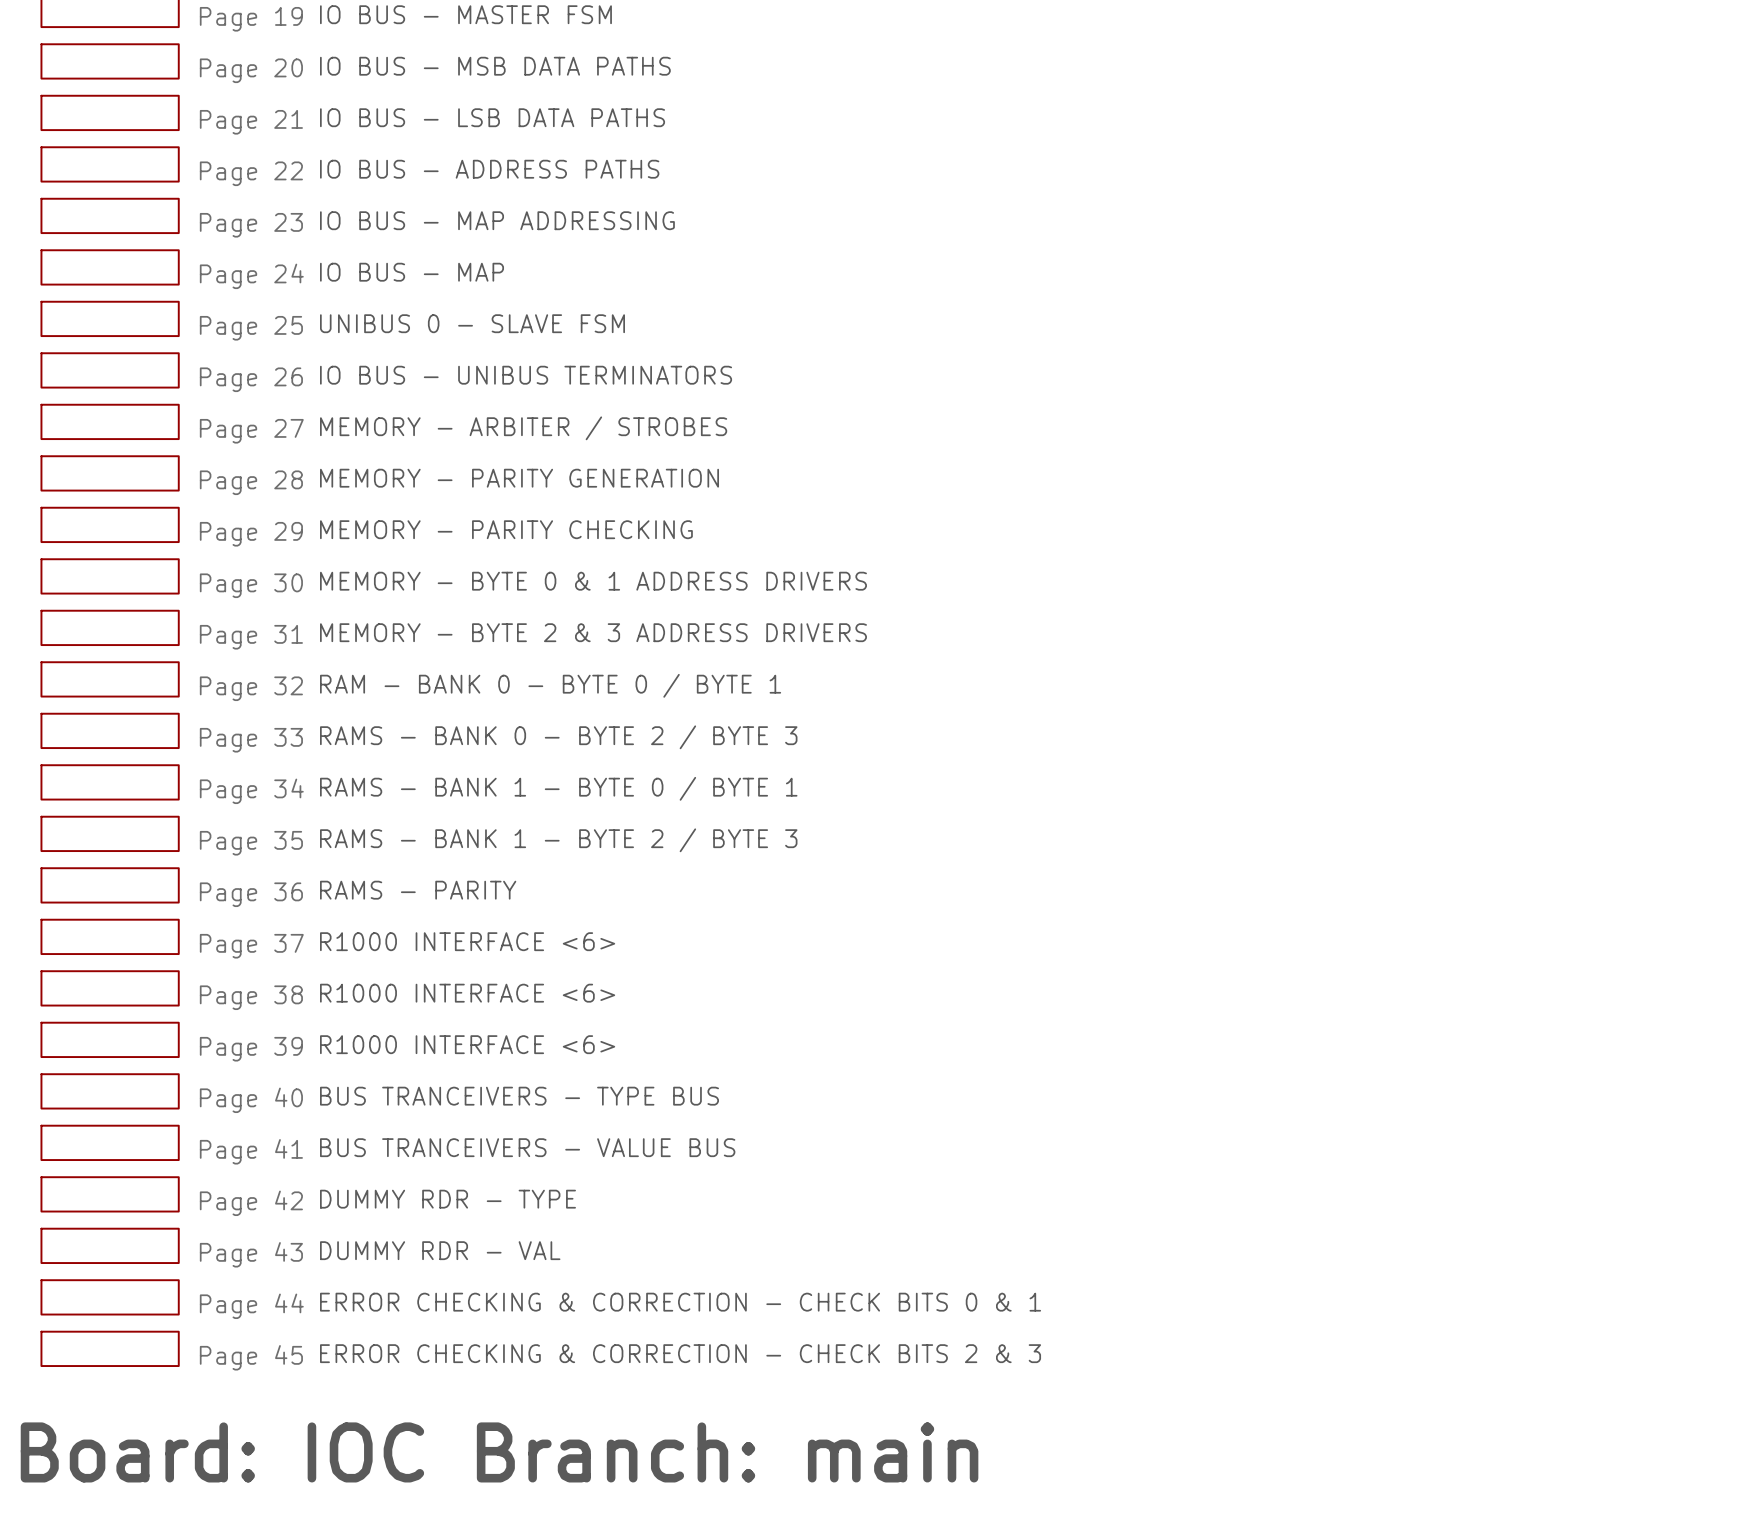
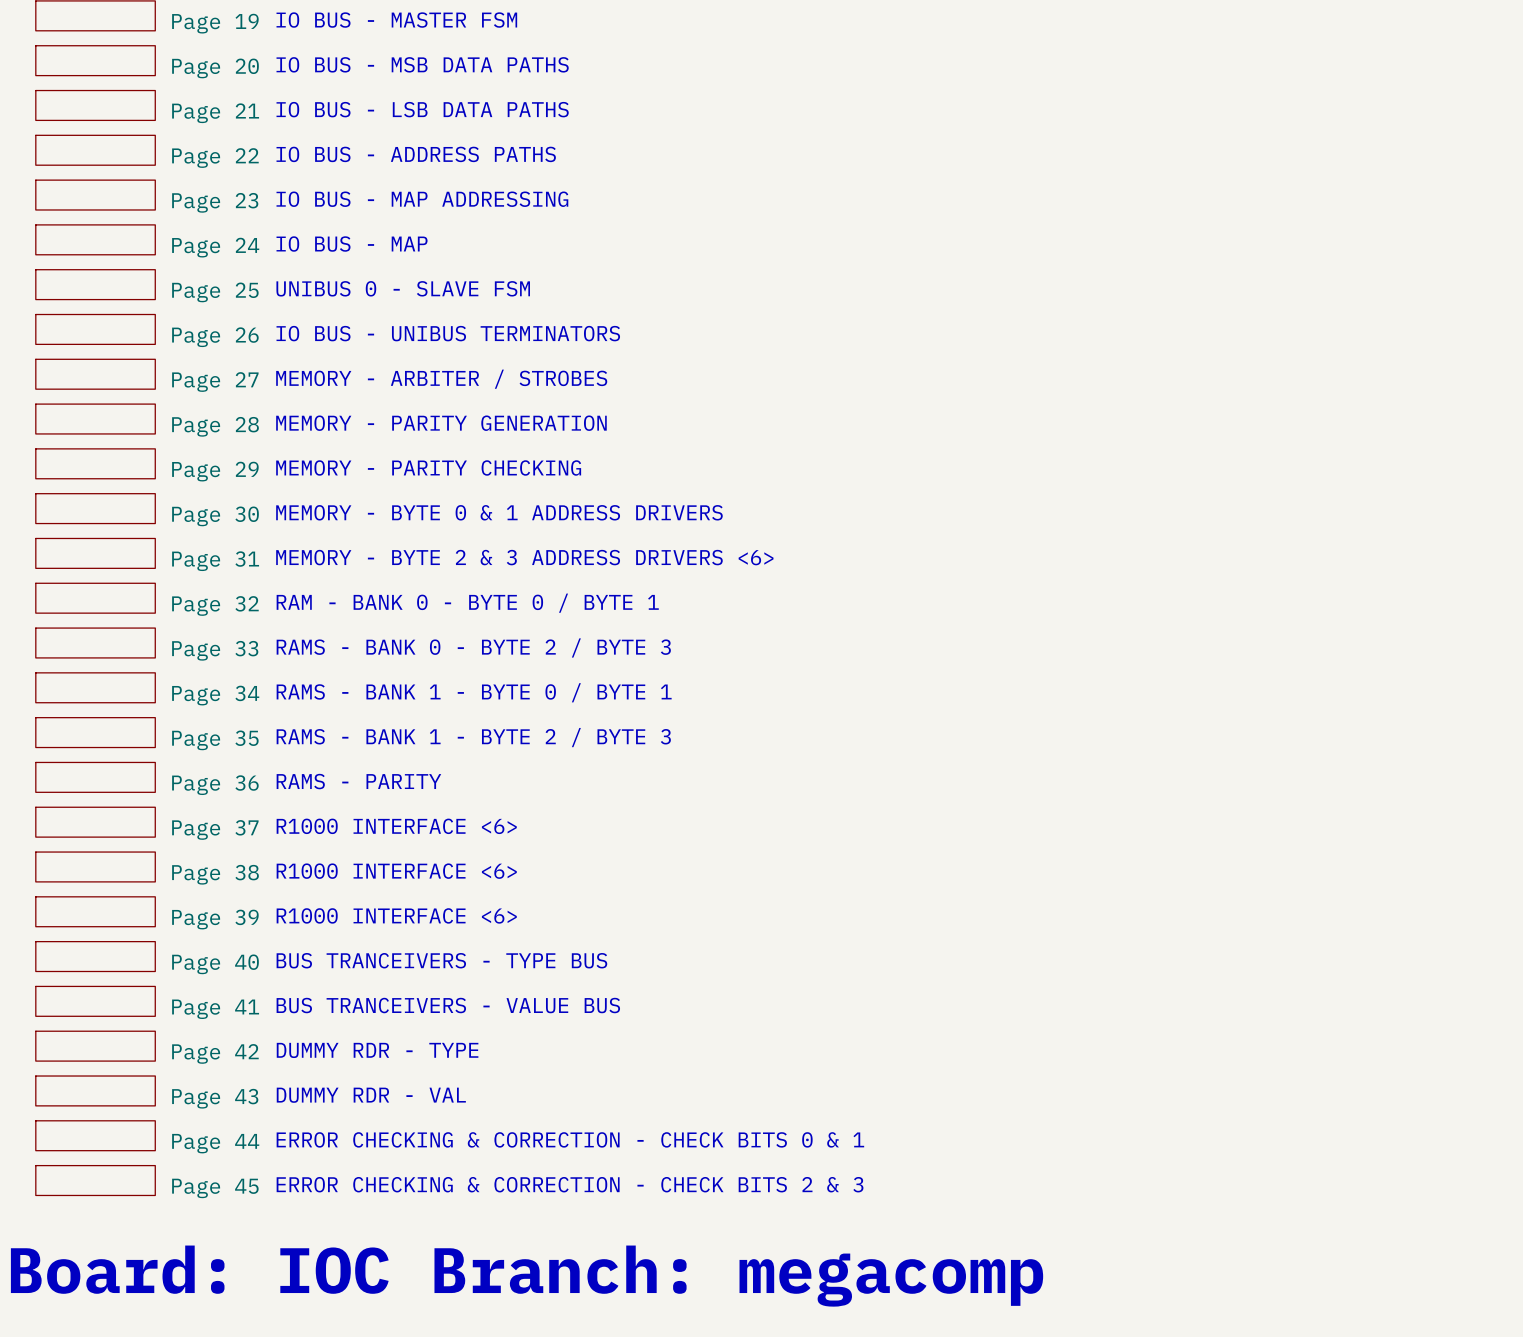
text: MEMORY - BYTE 2 & 3 ADDRESS DRIVERS (593, 632) -> MEMORY - BYTE 2 & 3 ADDRESS DRIVERS <6> (524, 557)
text: Board: IOC Branch: main (499, 1452) -> Board: IOC Branch: megacomp (527, 1276)

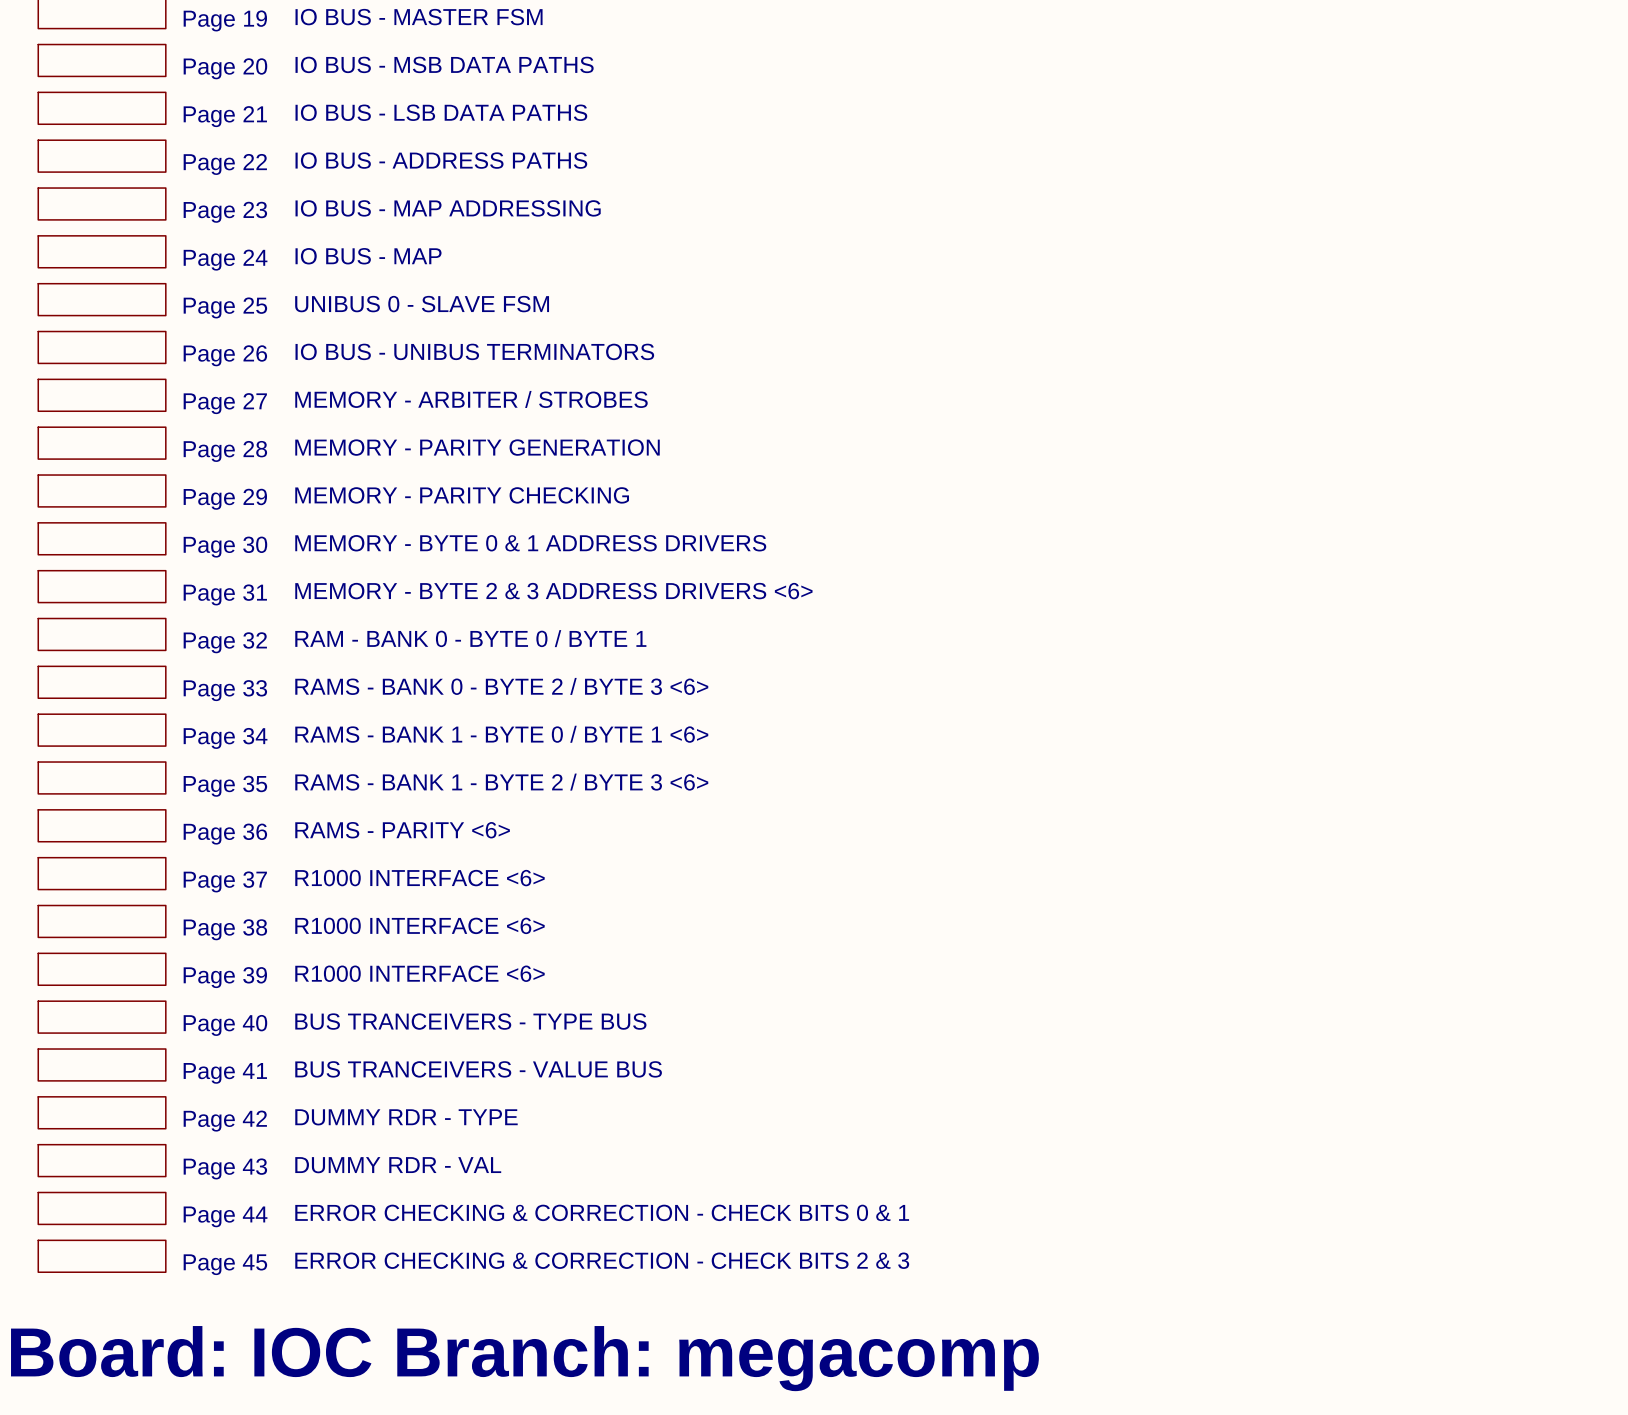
text: RAMS - BANK 0 - BYTE 2 / BYTE 3 (473, 647) -> RAMS - BANK 0 - BYTE 2 / BYTE 3 <6> (501, 686)
text: RAMS - BANK 1 - BYTE 0 / BYTE 1 (474, 692) -> RAMS - BANK 1 - BYTE 0 / BYTE 1 <6> (501, 734)
text: RAMS - BANK 1 - BYTE 2 / BYTE 3 (473, 737) -> RAMS - BANK 1 - BYTE 2 / BYTE 3 <6> (501, 782)
text: RAMS - PARITY (358, 781) -> RAMS - PARITY <6> (402, 830)

